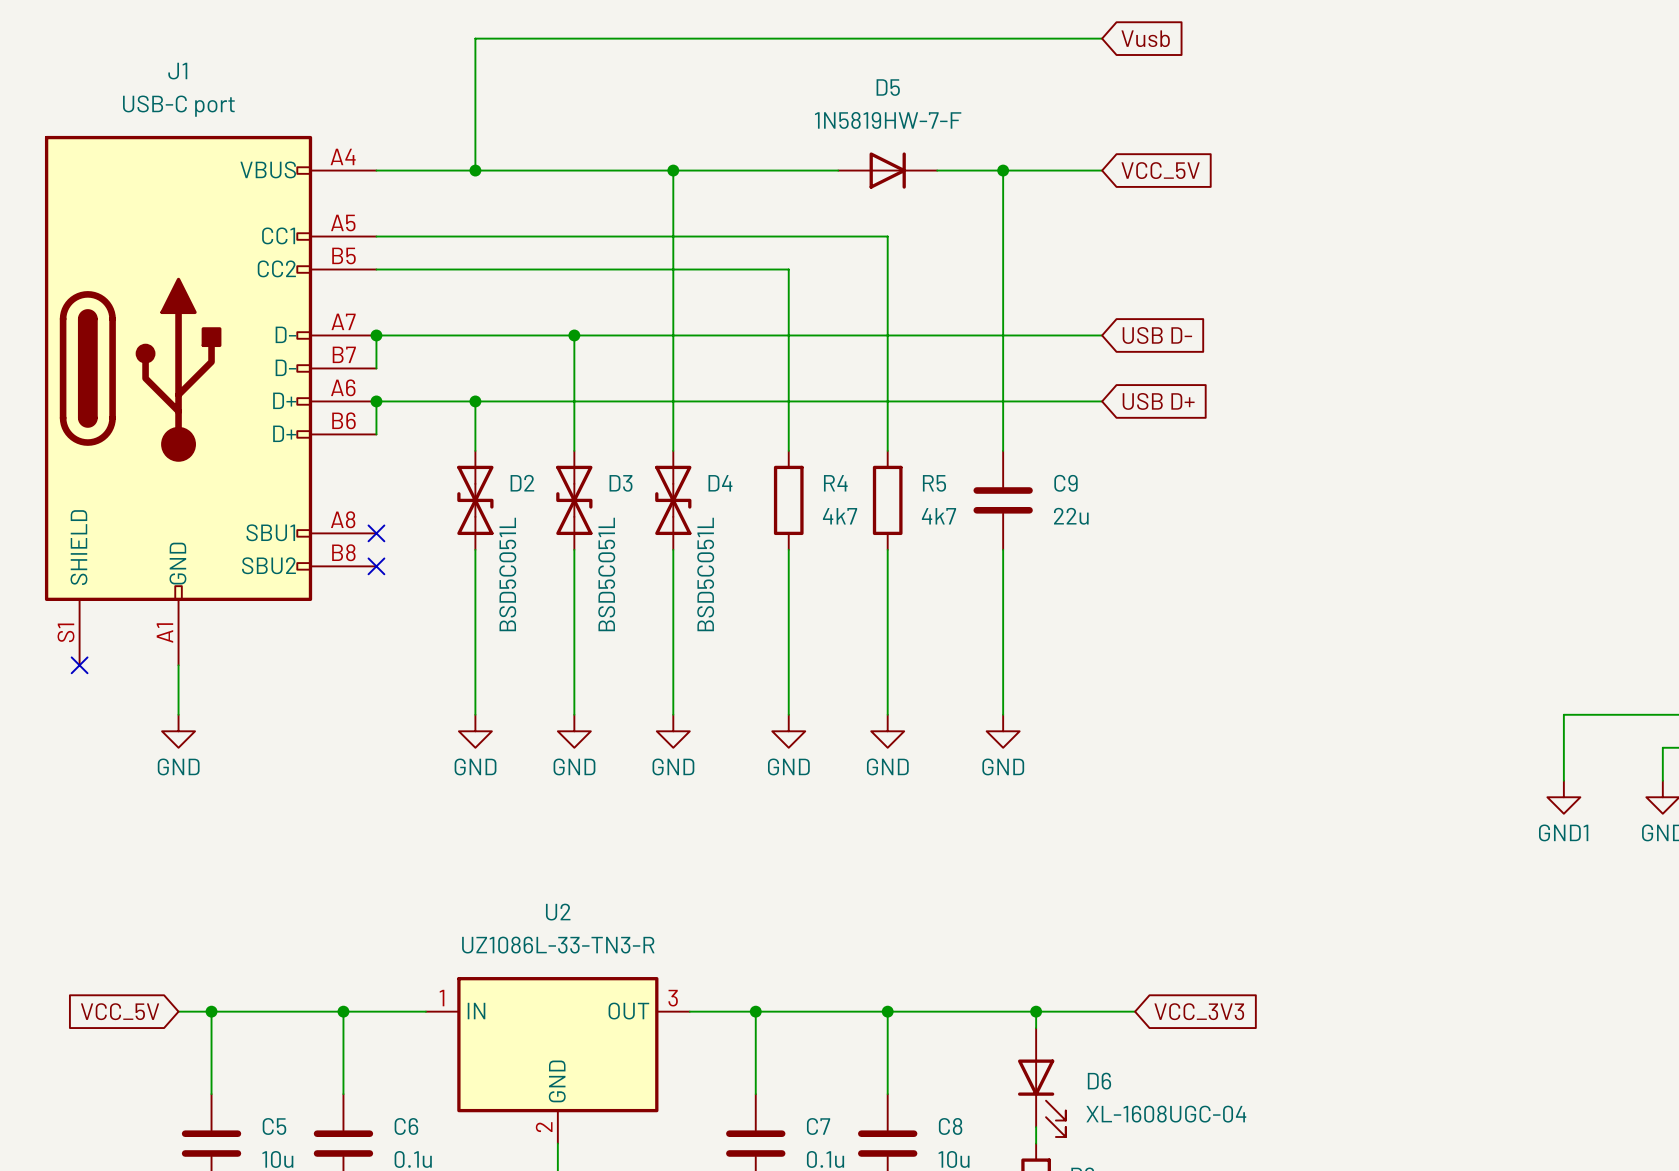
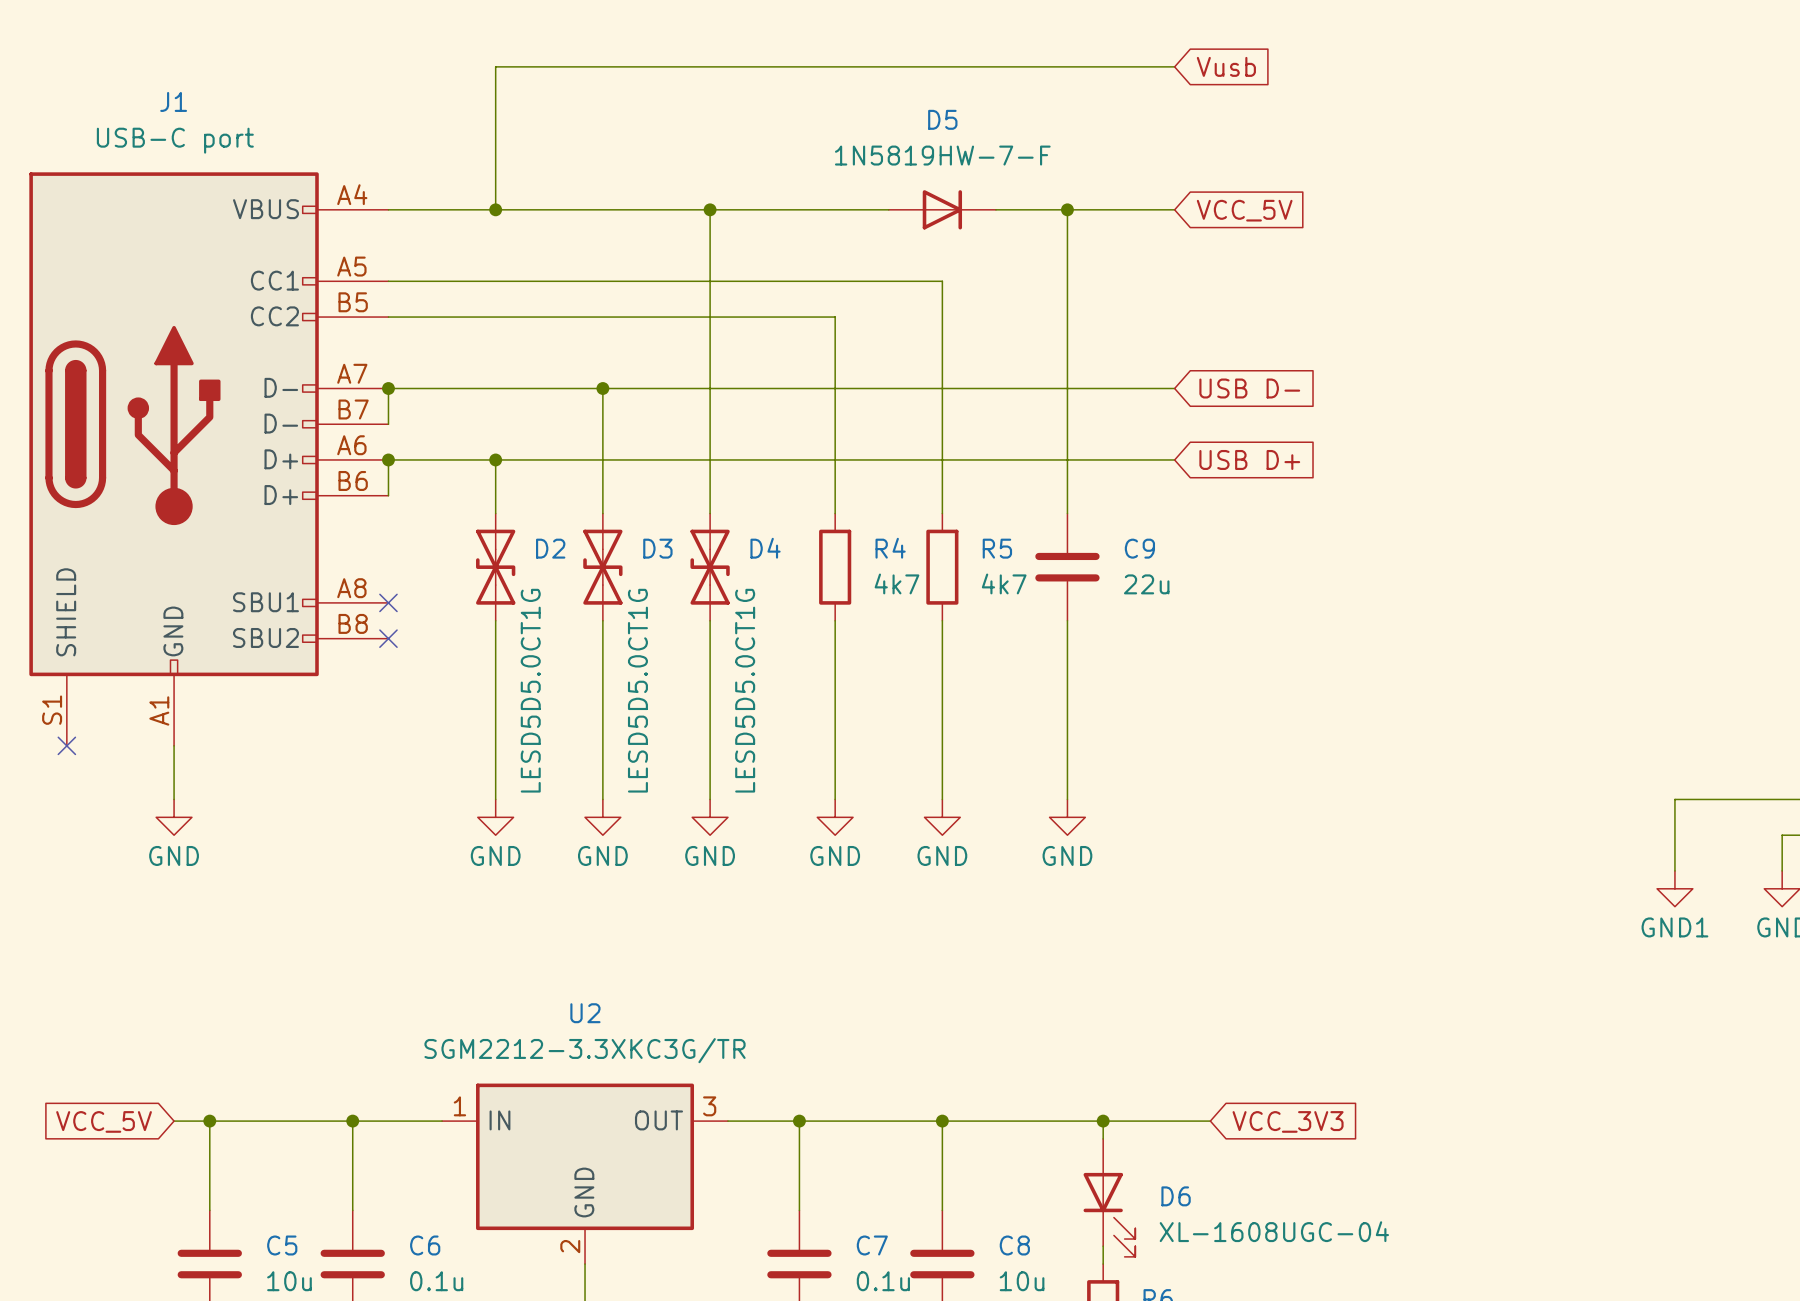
D2 value: BSD5C051L (507, 574) -> LESD5D5.0CT1G (530, 690)
D3 value: BSD5C051L (606, 574) -> LESD5D5.0CT1G (637, 690)
D4 value: BSD5C051L (705, 574) -> LESD5D5.0CT1G (745, 690)
U2 value: UZ1086L-33-TN3-R (558, 945) -> SGM2212-3.3XKC3G/TR (585, 1050)

